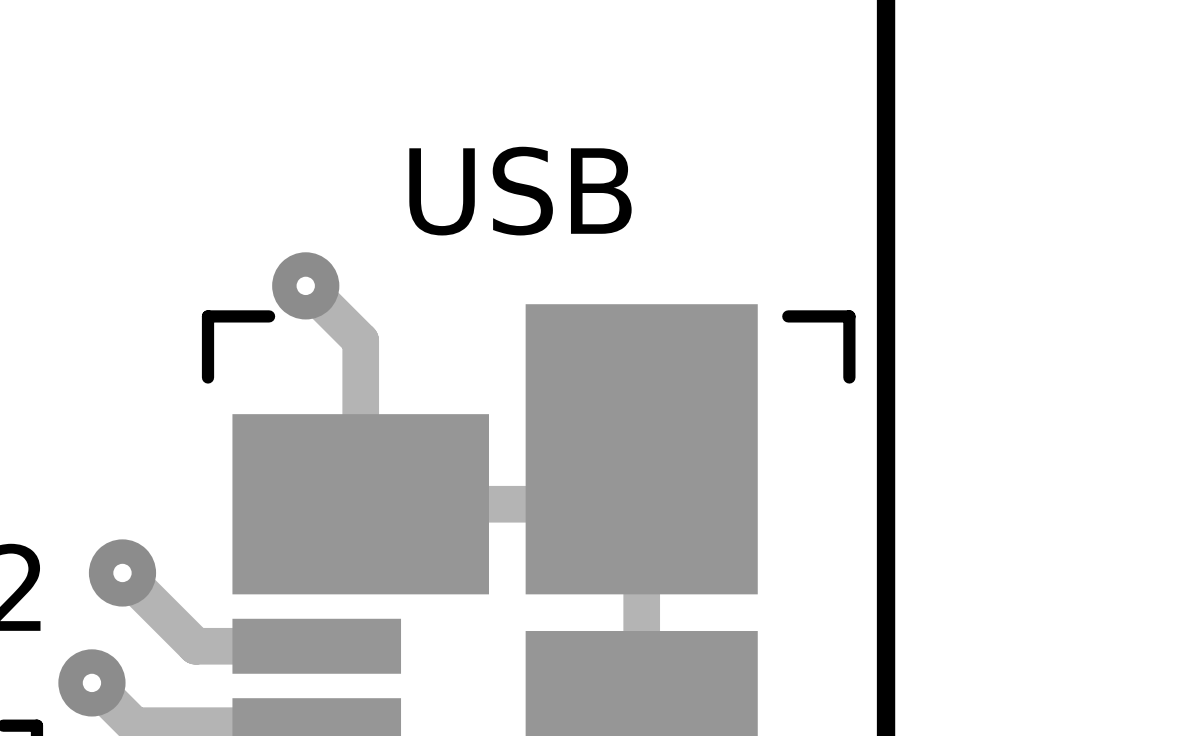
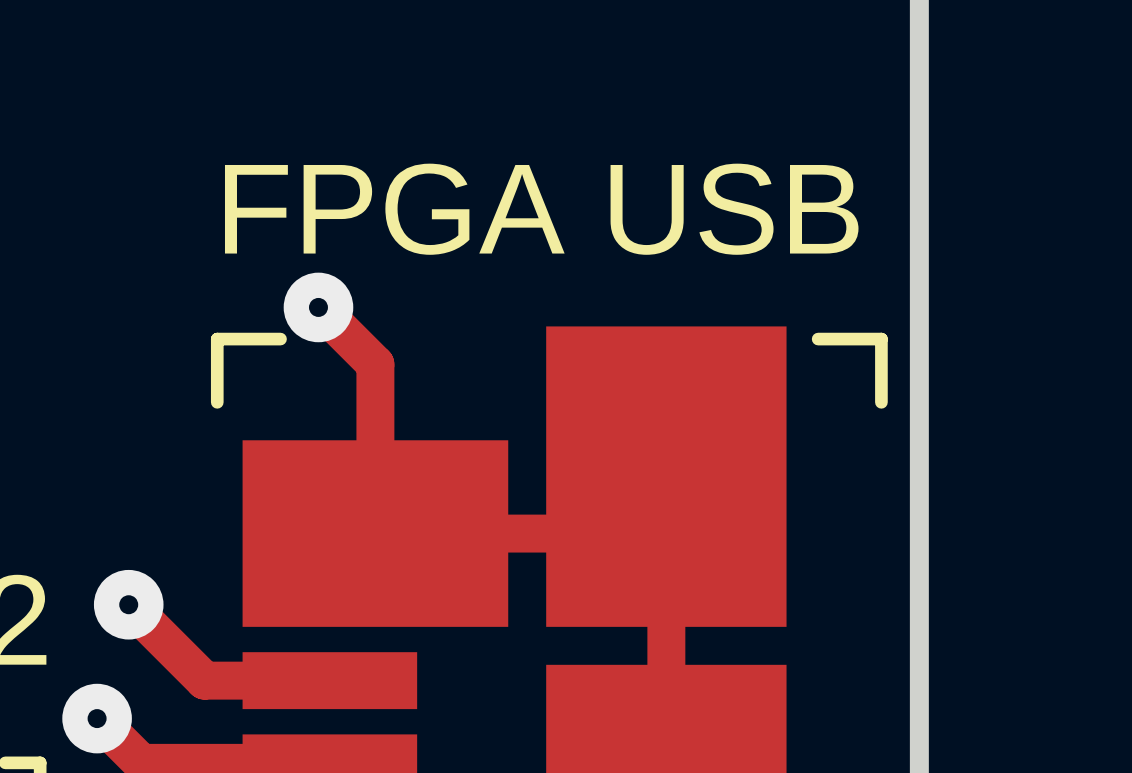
text: USB (520, 191) -> FPGA USB (541, 209)

